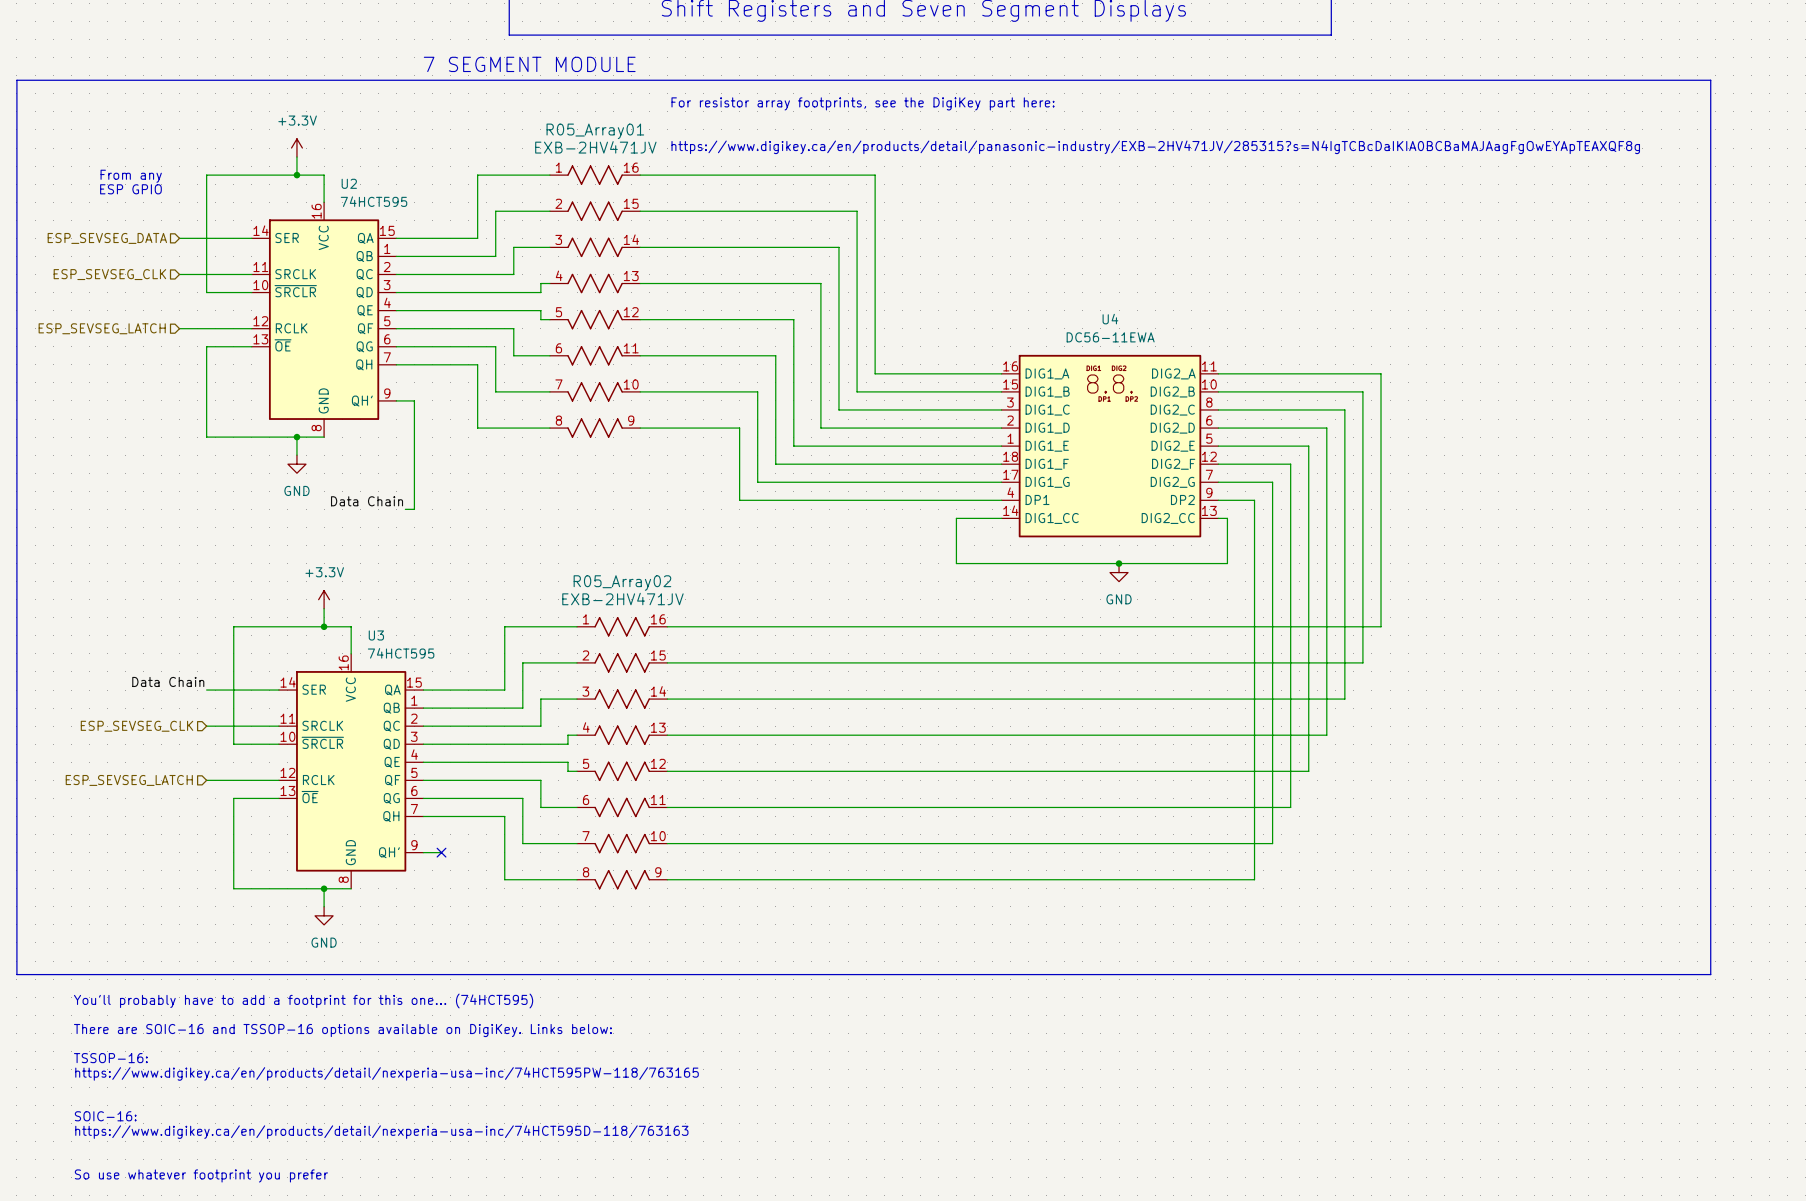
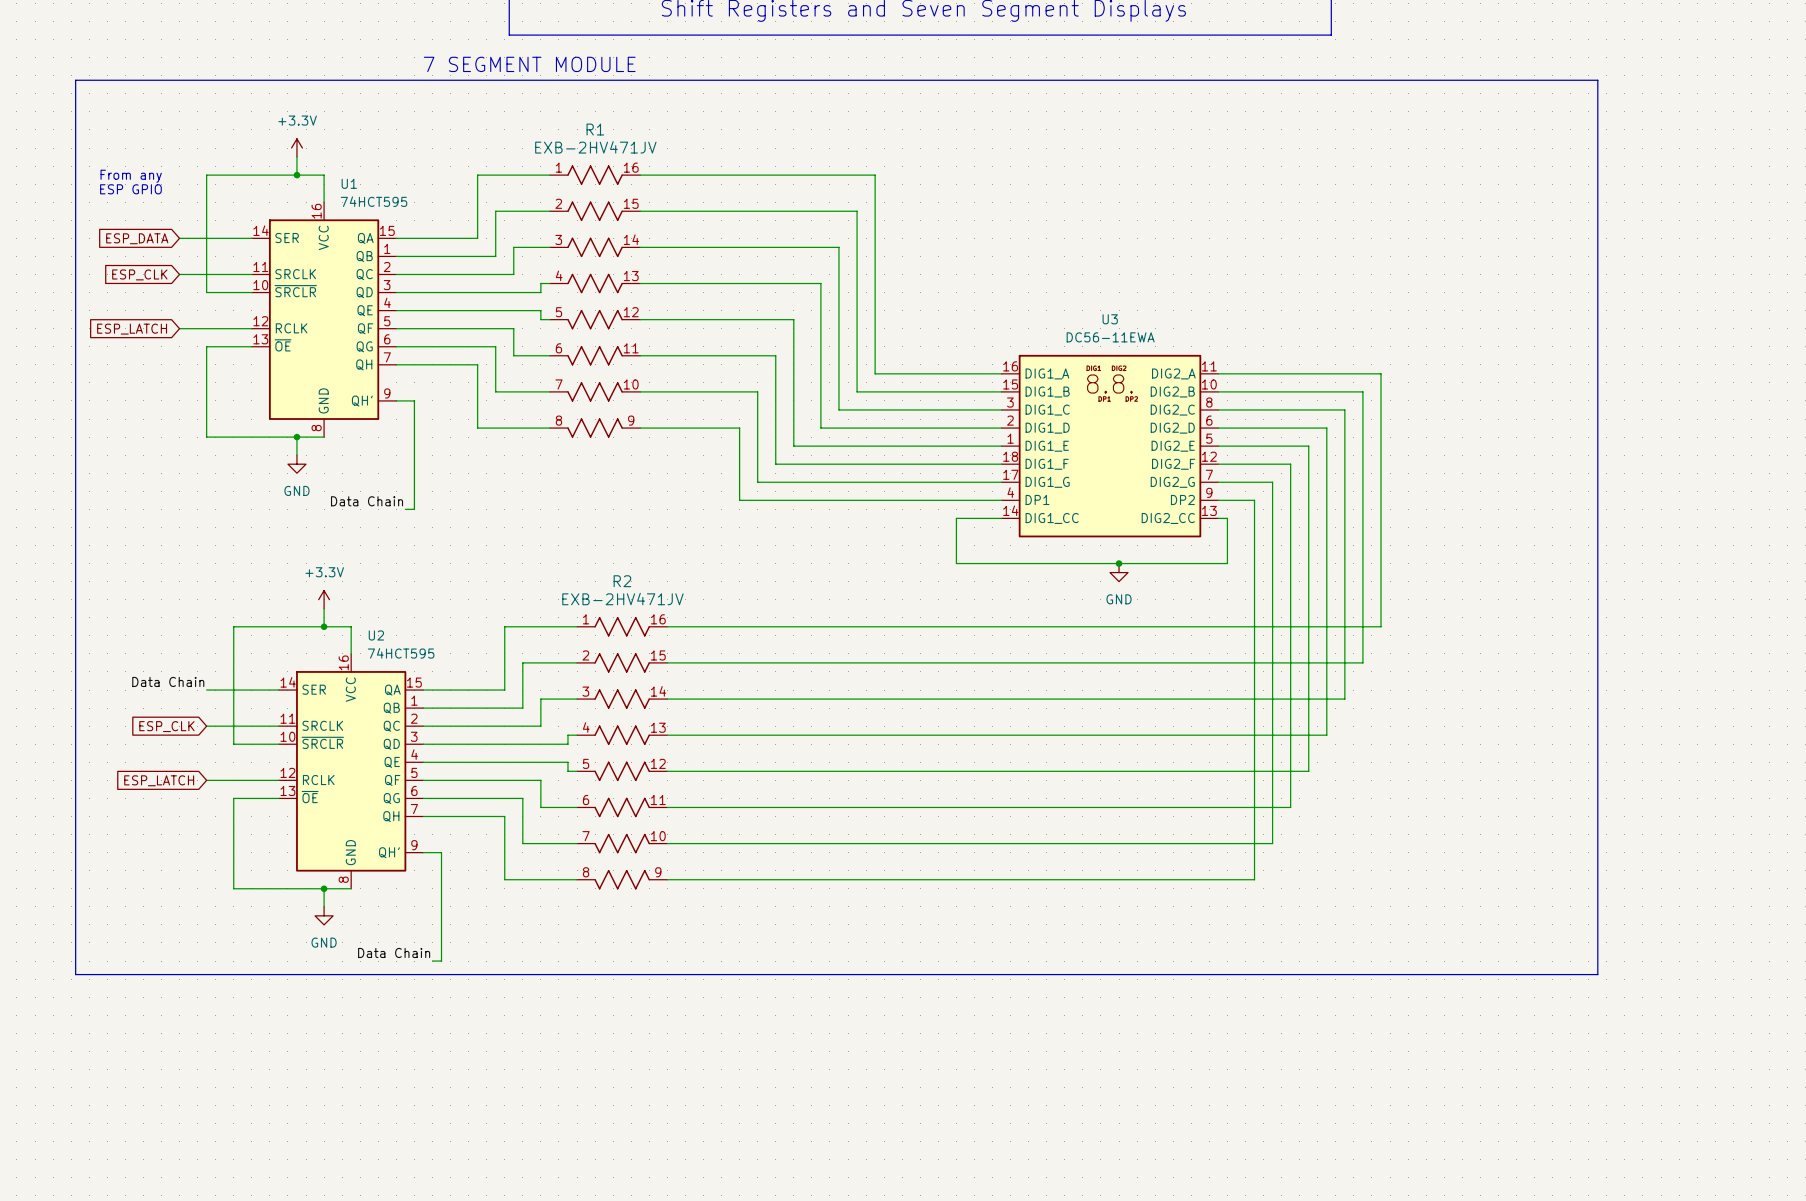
line: (75, 80) (16, 80) (16, 974) (75, 974) -> (75, 80) (75, 974)
line: (1597, 80) (1710, 80) (1710, 974) (1597, 974) -> (1597, 80) (1597, 974)
text: For resistor array footprints, see the DigiKey part here: (863, 103) -> none
R05_Array01 name: R05_Array01 (595, 131) -> R1 (595, 129)
text: https://www.digikey.ca/en/products/detail/panasonic-industry/EXB-2HV471JV/285315?s=N4IgTCBcDaIKIA0BCBaMAJAagFgOwEYApTEAXQF8g (1155, 147) -> none
U2 name: U2 (349, 183) -> U1 (349, 183)
hierarchical label: ESP_SEVSEG_DATA (107, 238) -> none
global label: none -> ESP_DATA (137, 238)
hierarchical label: ESP_SEVSEG_CLK (109, 274) -> none
global label: none -> ESP_CLK (139, 274)
U4 name: U4 (1110, 319) -> U3 (1110, 319)
hierarchical label: ESP_SEVSEG_LATCH (102, 328) -> none
global label: none -> ESP_LATCH (132, 329)
R05_Array02 name: R05_Array02 (622, 583) -> R2 (622, 581)
U3 name: U3 (376, 635) -> U2 (376, 635)
hierarchical label: ESP_SEVSEG_CLK (137, 726) -> none
global label: none -> ESP_CLK (166, 726)
hierarchical label: ESP_SEVSEG_LATCH (129, 780) -> none
global label: none -> ESP_LATCH (159, 780)
wire: none -> (441, 852) (441, 961) (432, 961)
no-connect mark: (441, 852) -> none
label: none -> Data Chain (394, 952)
text: You'll probably have to add a footprint for this one... (74HCT595) (303, 1001) -> none
text: There are SOIC-16 and TSSOP-16 options available on DigiKey. Links below: (342, 1030) -> none
text: TSSOP-16: (110, 1058) -> none
text: https://www.digikey.ca/en/products/detail/nexperia-usa-inc/74HCT595PW-118/763165 (387, 1073) -> none
text: SOIC-16: (105, 1116) -> none
text: https://www.digikey.ca/en/products/detail/nexperia-usa-inc/74HCT595D-118/763163 (381, 1132) -> none
text: So use whatever footprint you prefer (201, 1175) -> none

